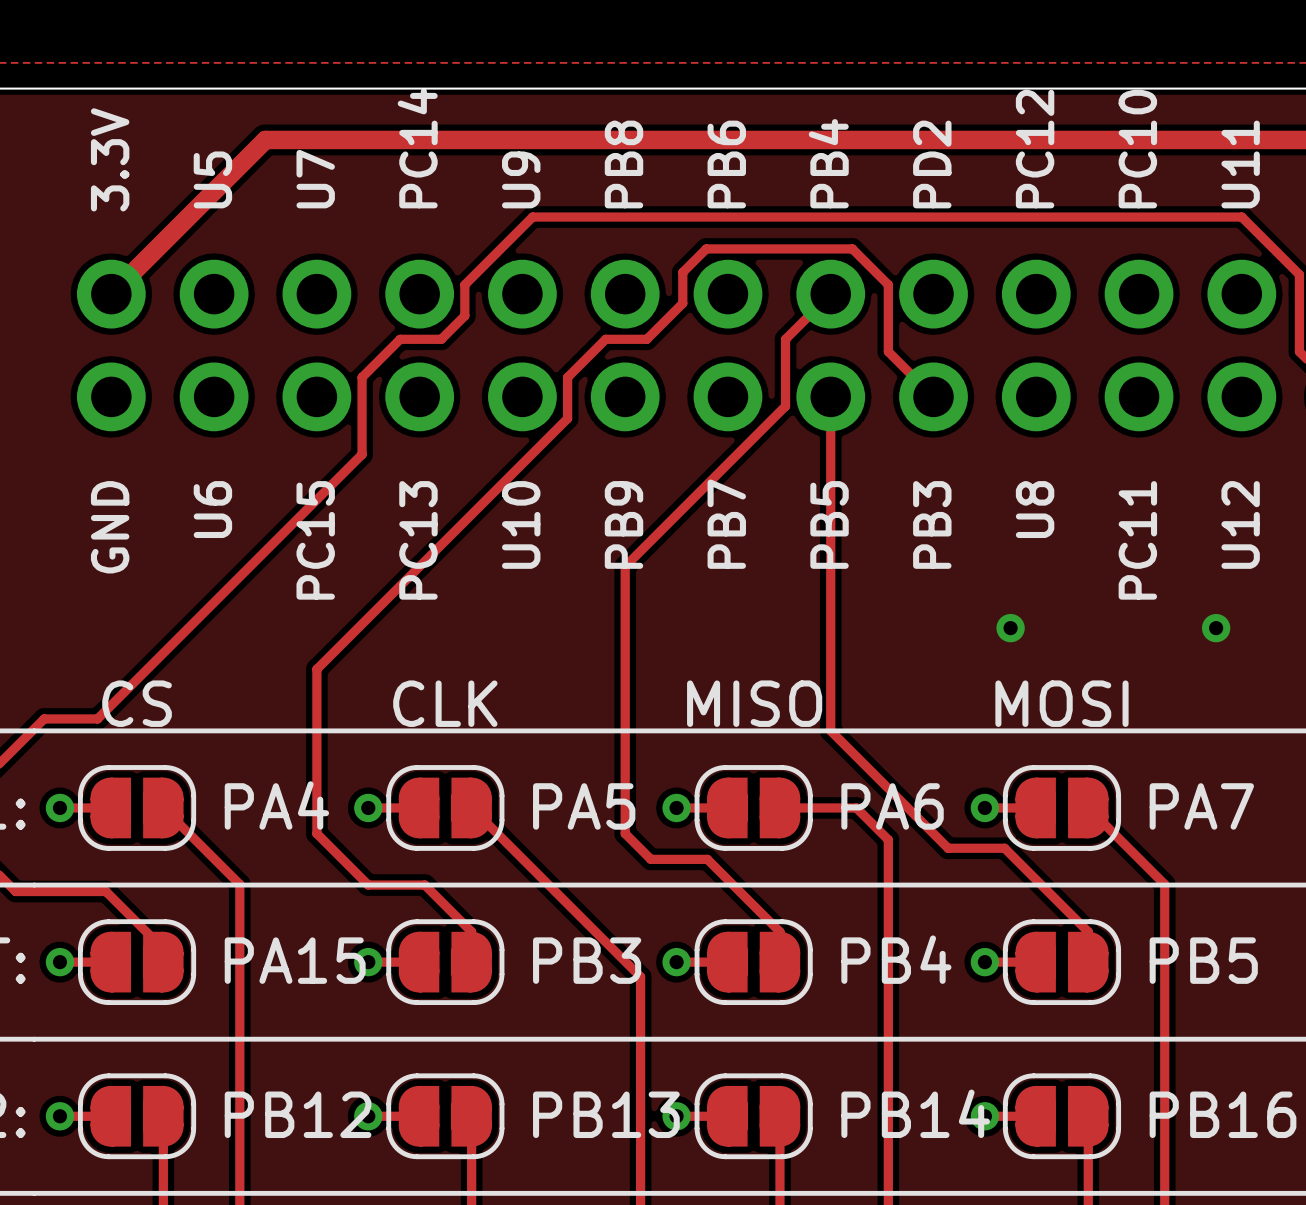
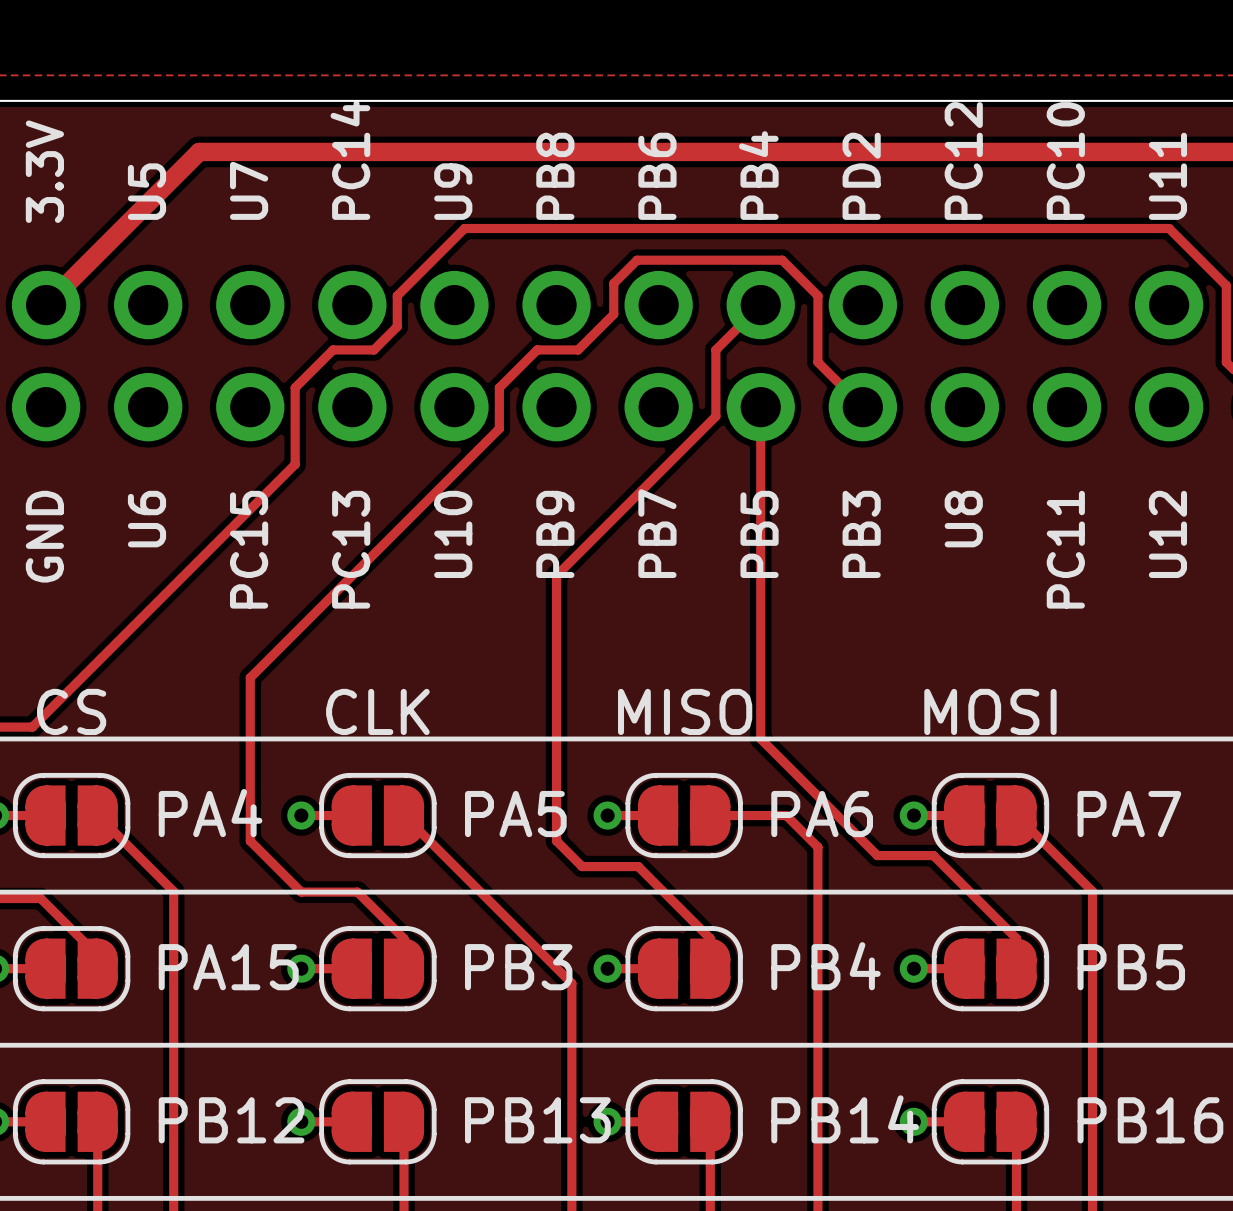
via: (1010, 628) -> none
via: (1216, 628) -> none

